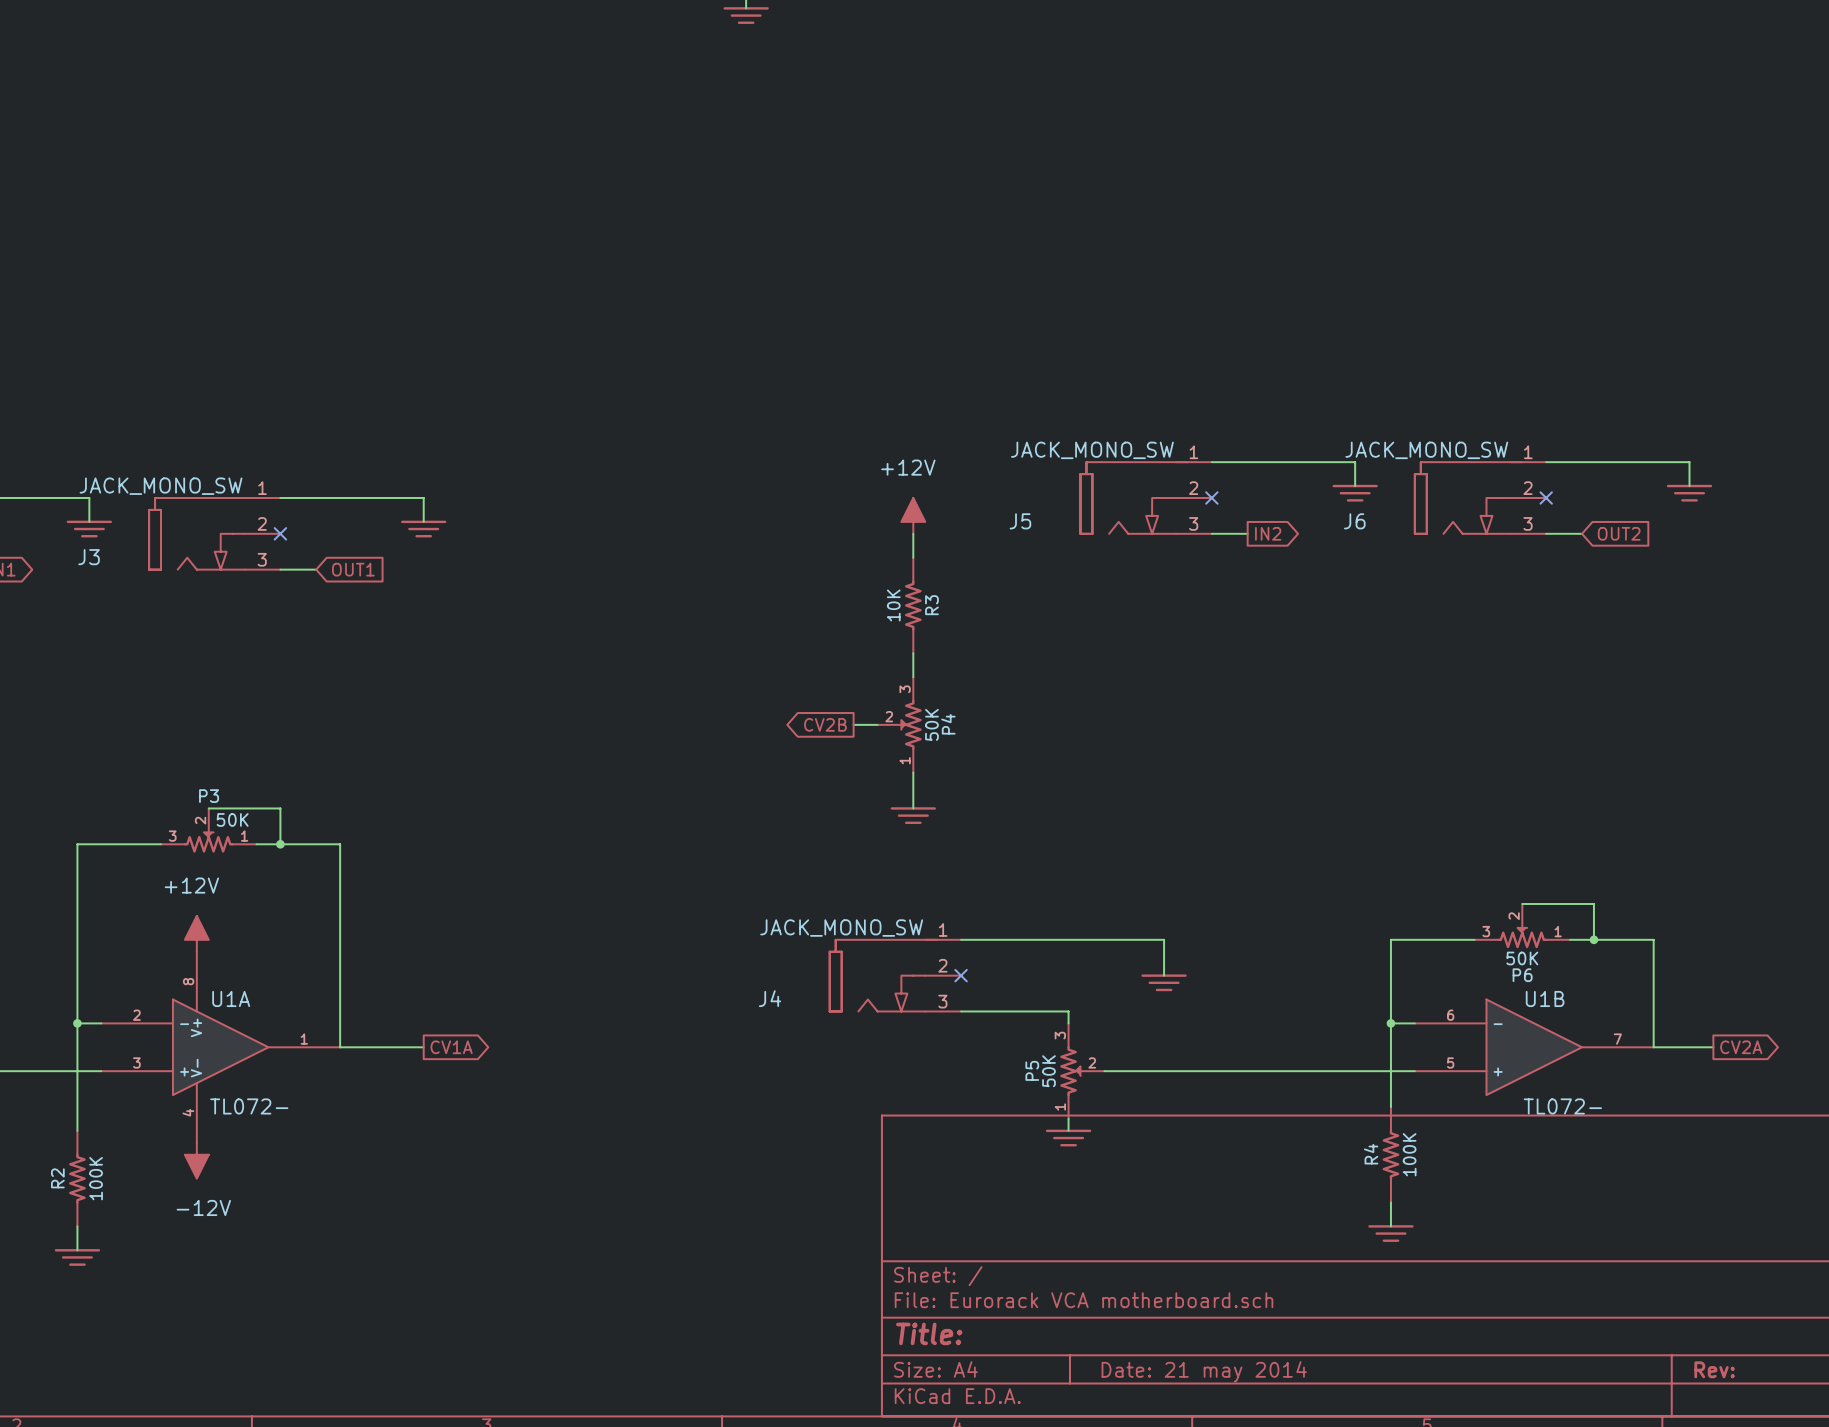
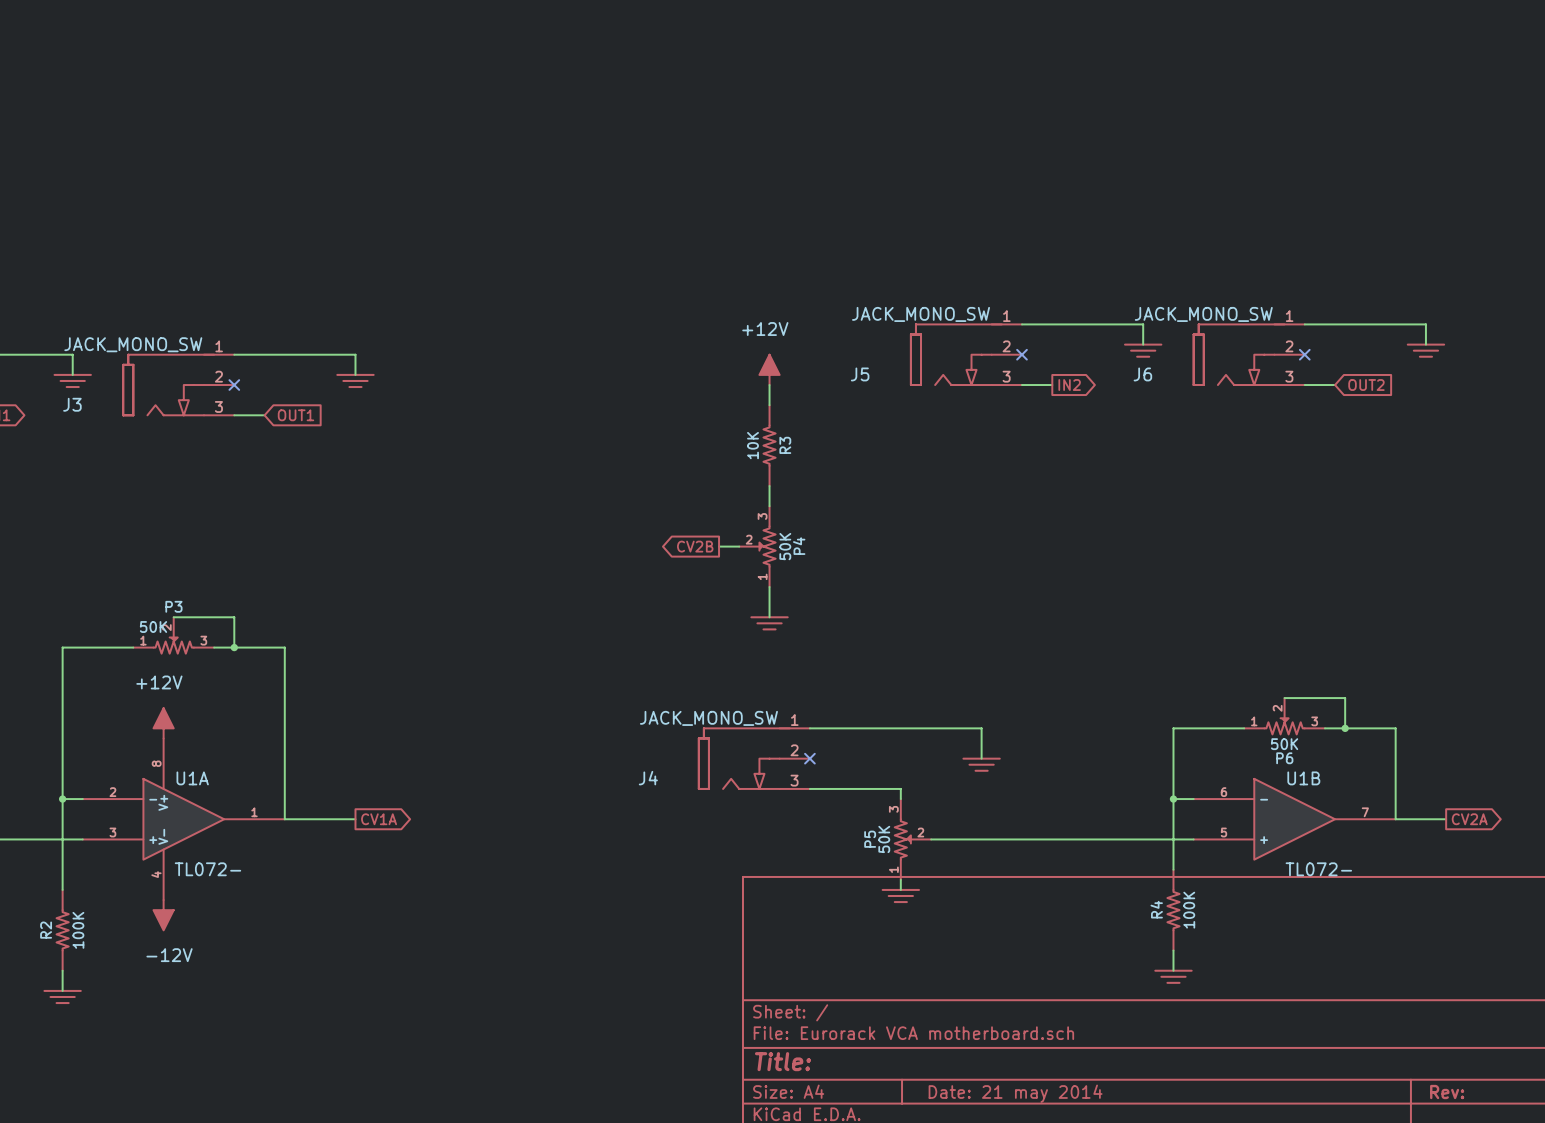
P3 flip: as is (208, 842) -> left-right (173, 646)
P6 flip: as is (1522, 938) -> left-right (1284, 726)

